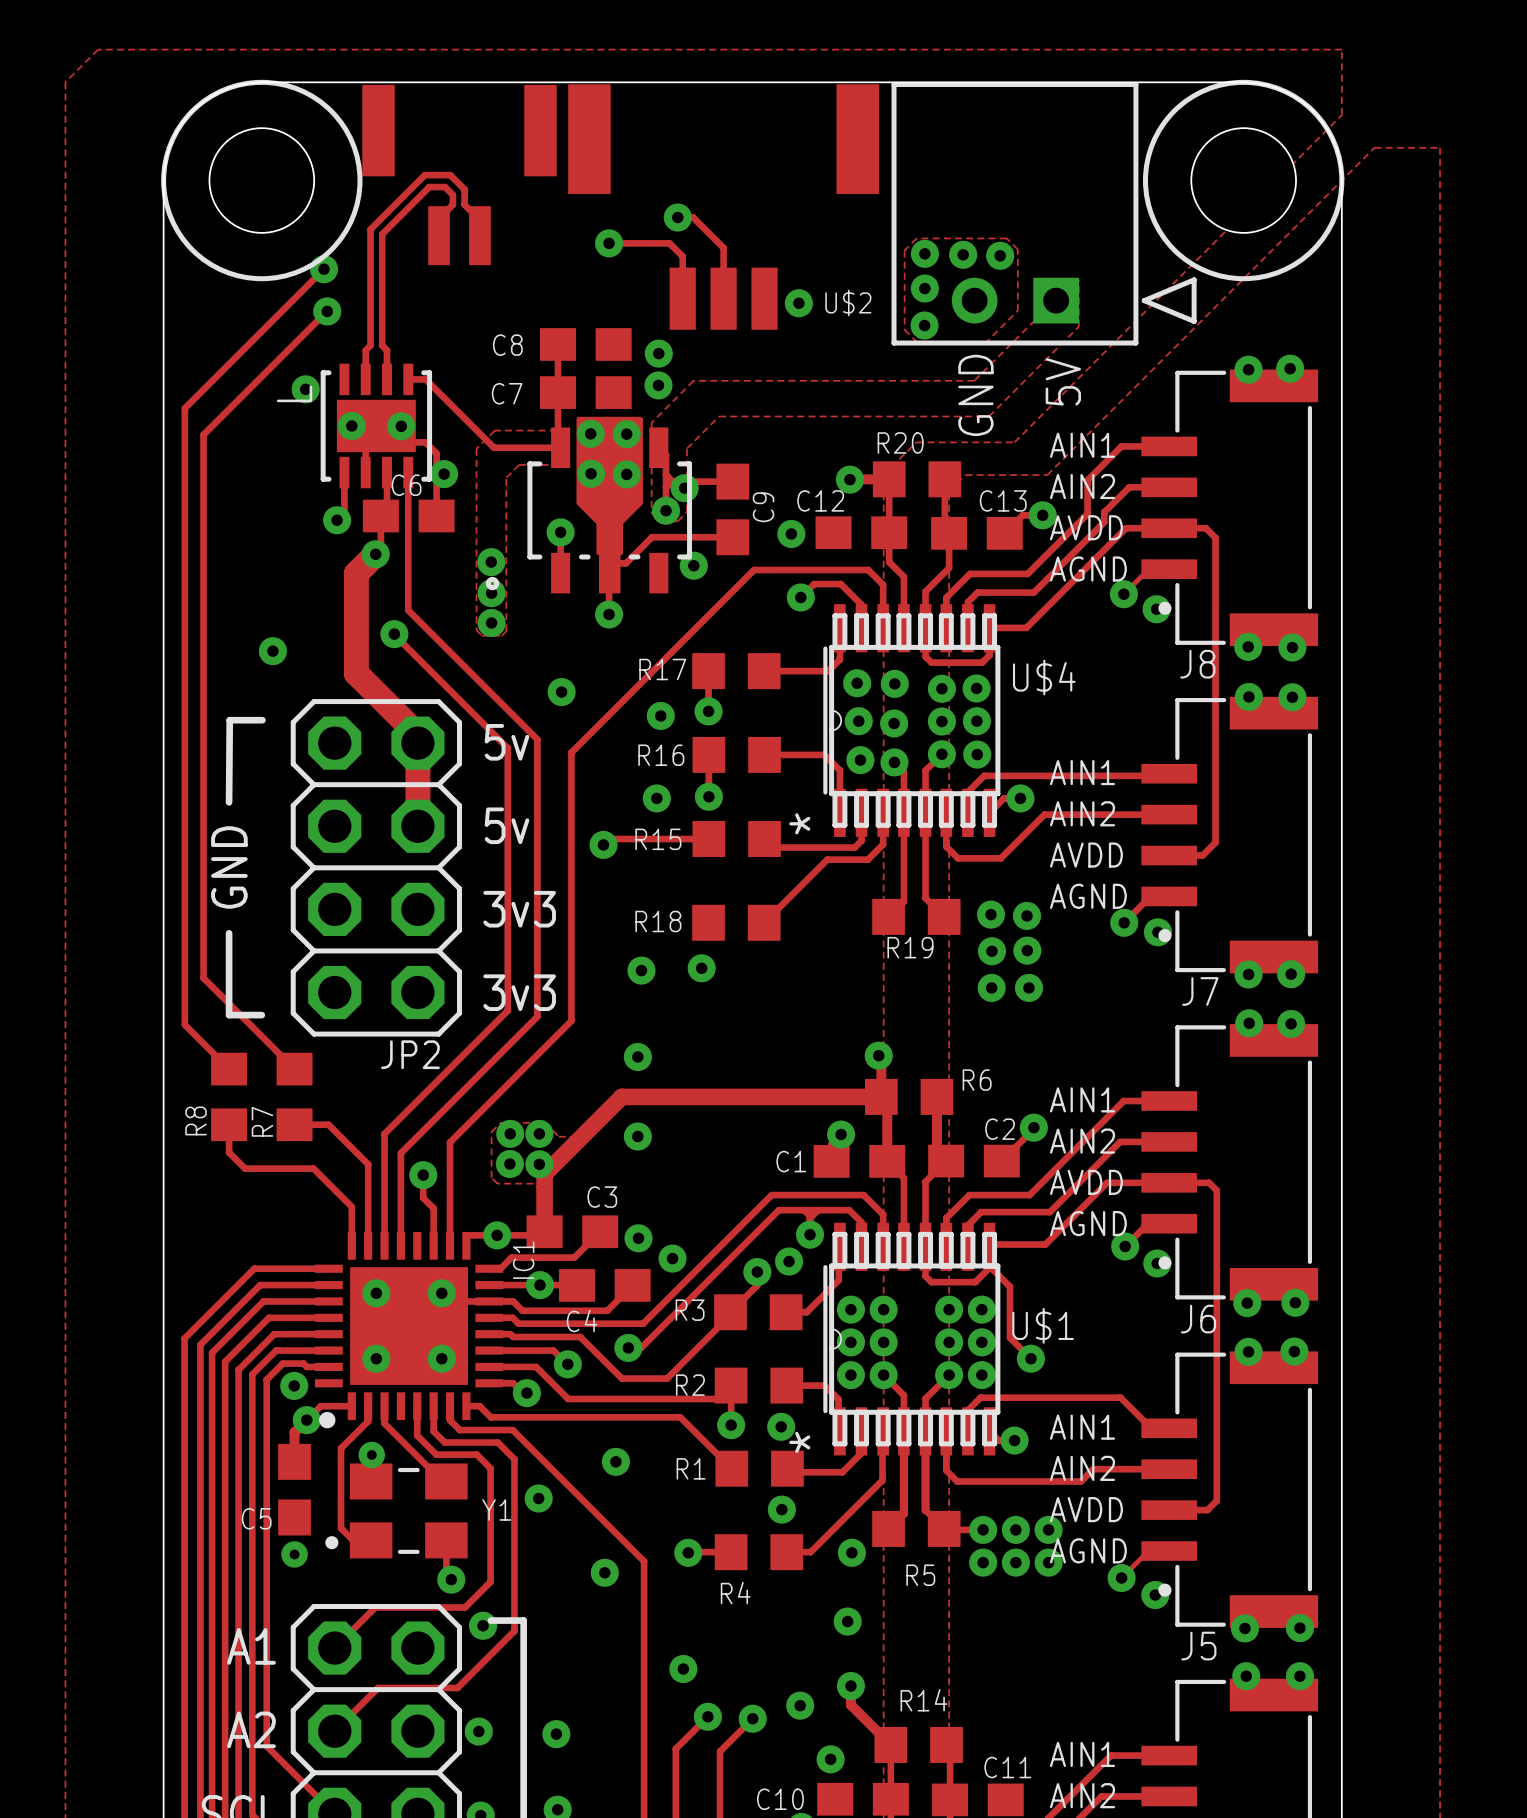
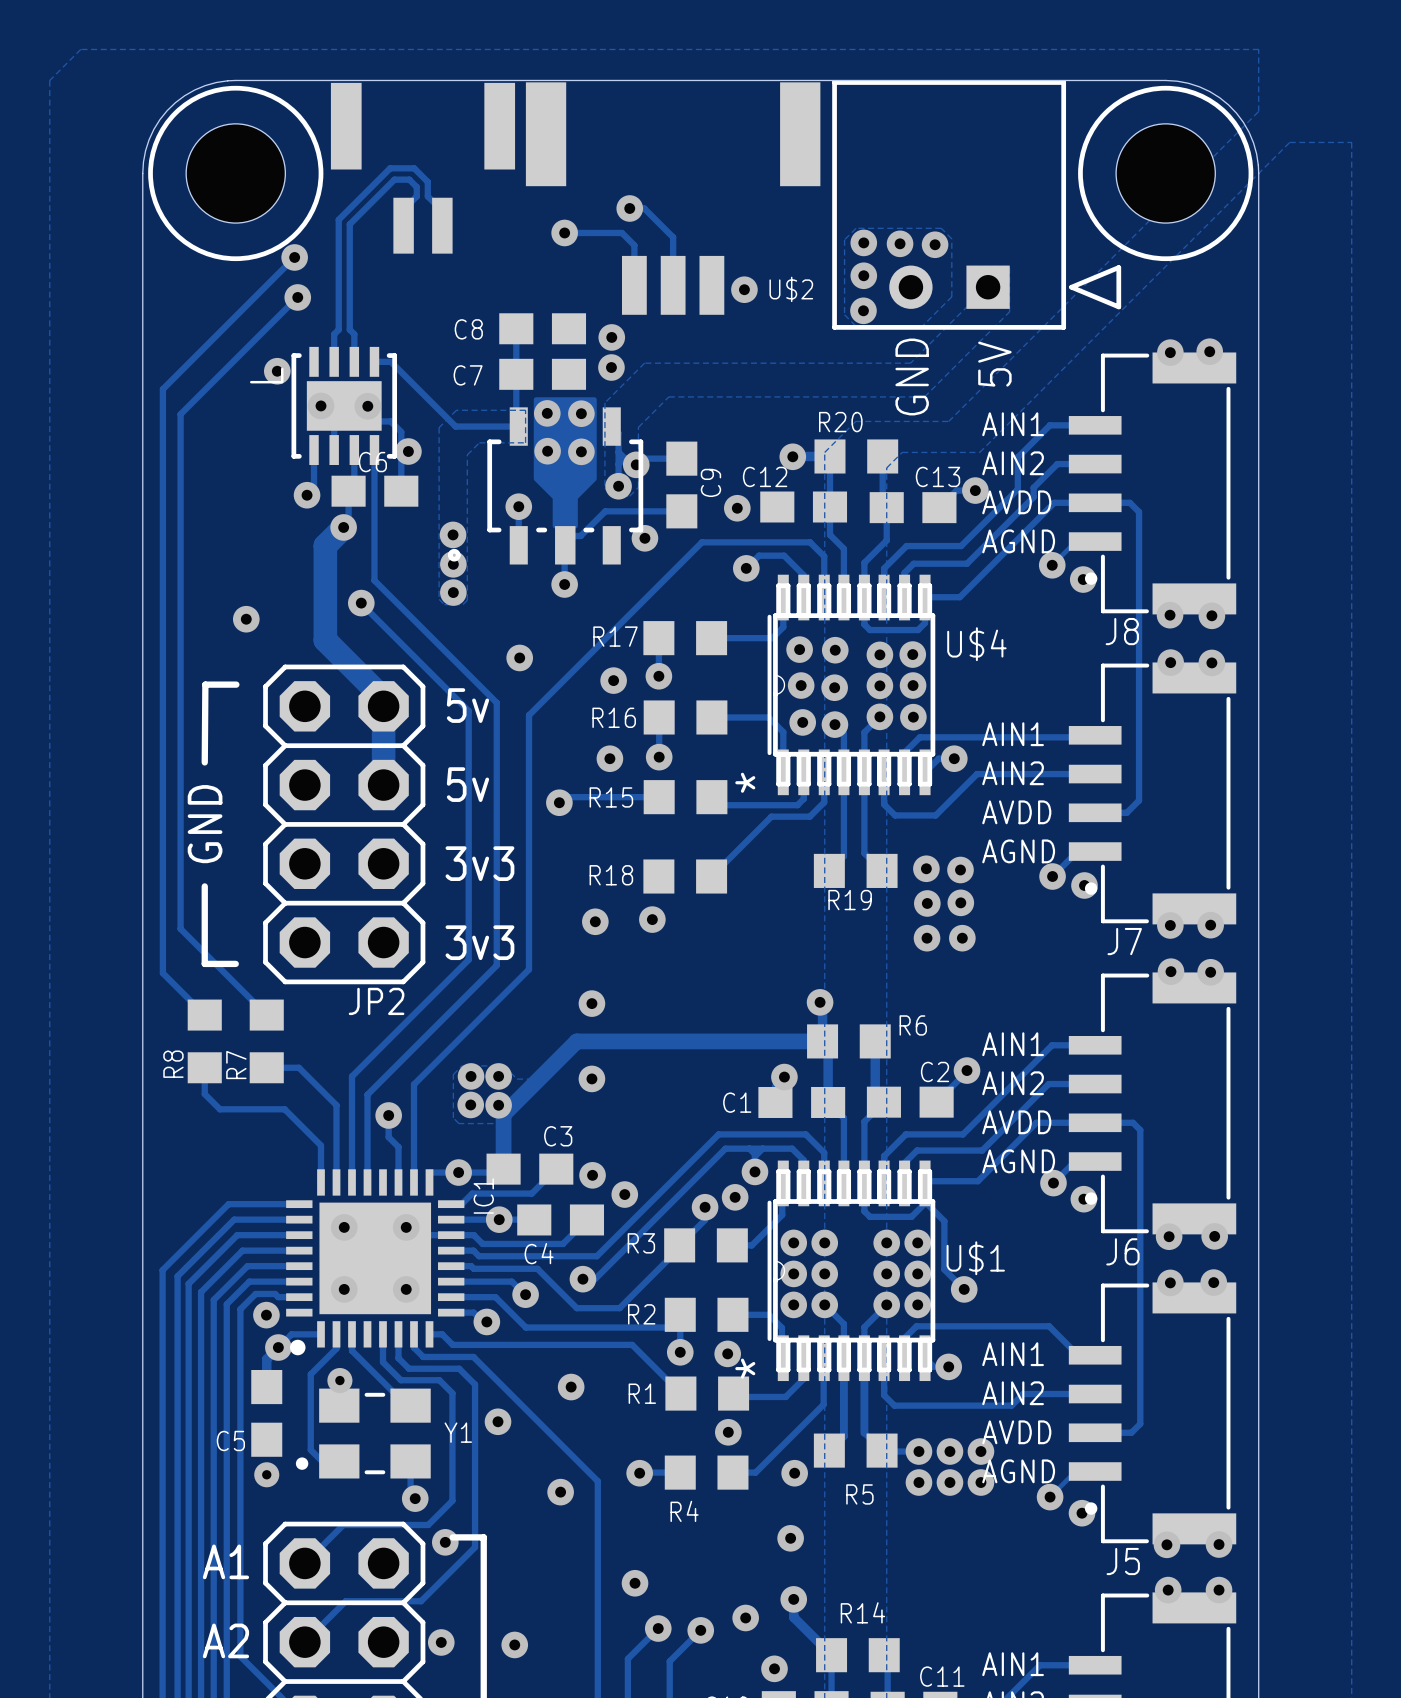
drawing shape: [161, 79, 363, 282] -> [148, 85, 324, 262]
drawing shape: [1142, 79, 1345, 282] -> [1078, 85, 1254, 262]

